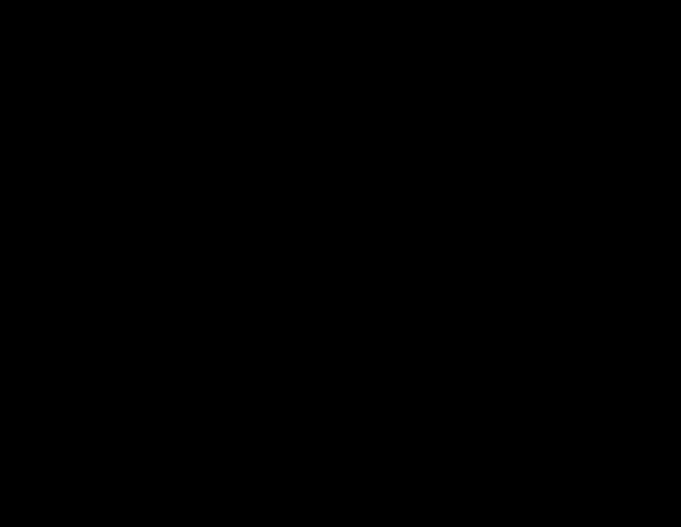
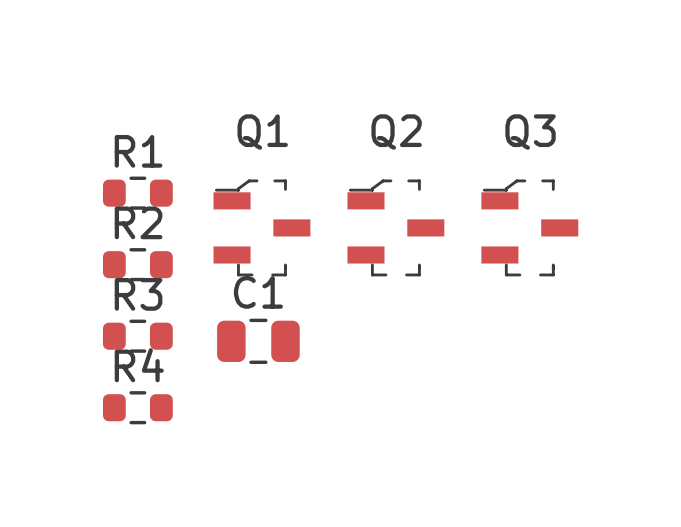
R1: none -> (137, 193)
Q1: none -> (261, 227)
Q2: none -> (395, 227)
Q3: none -> (529, 227)
R2: none -> (137, 264)
R3: none -> (137, 336)
C1: none -> (258, 341)
R4: none -> (137, 407)

